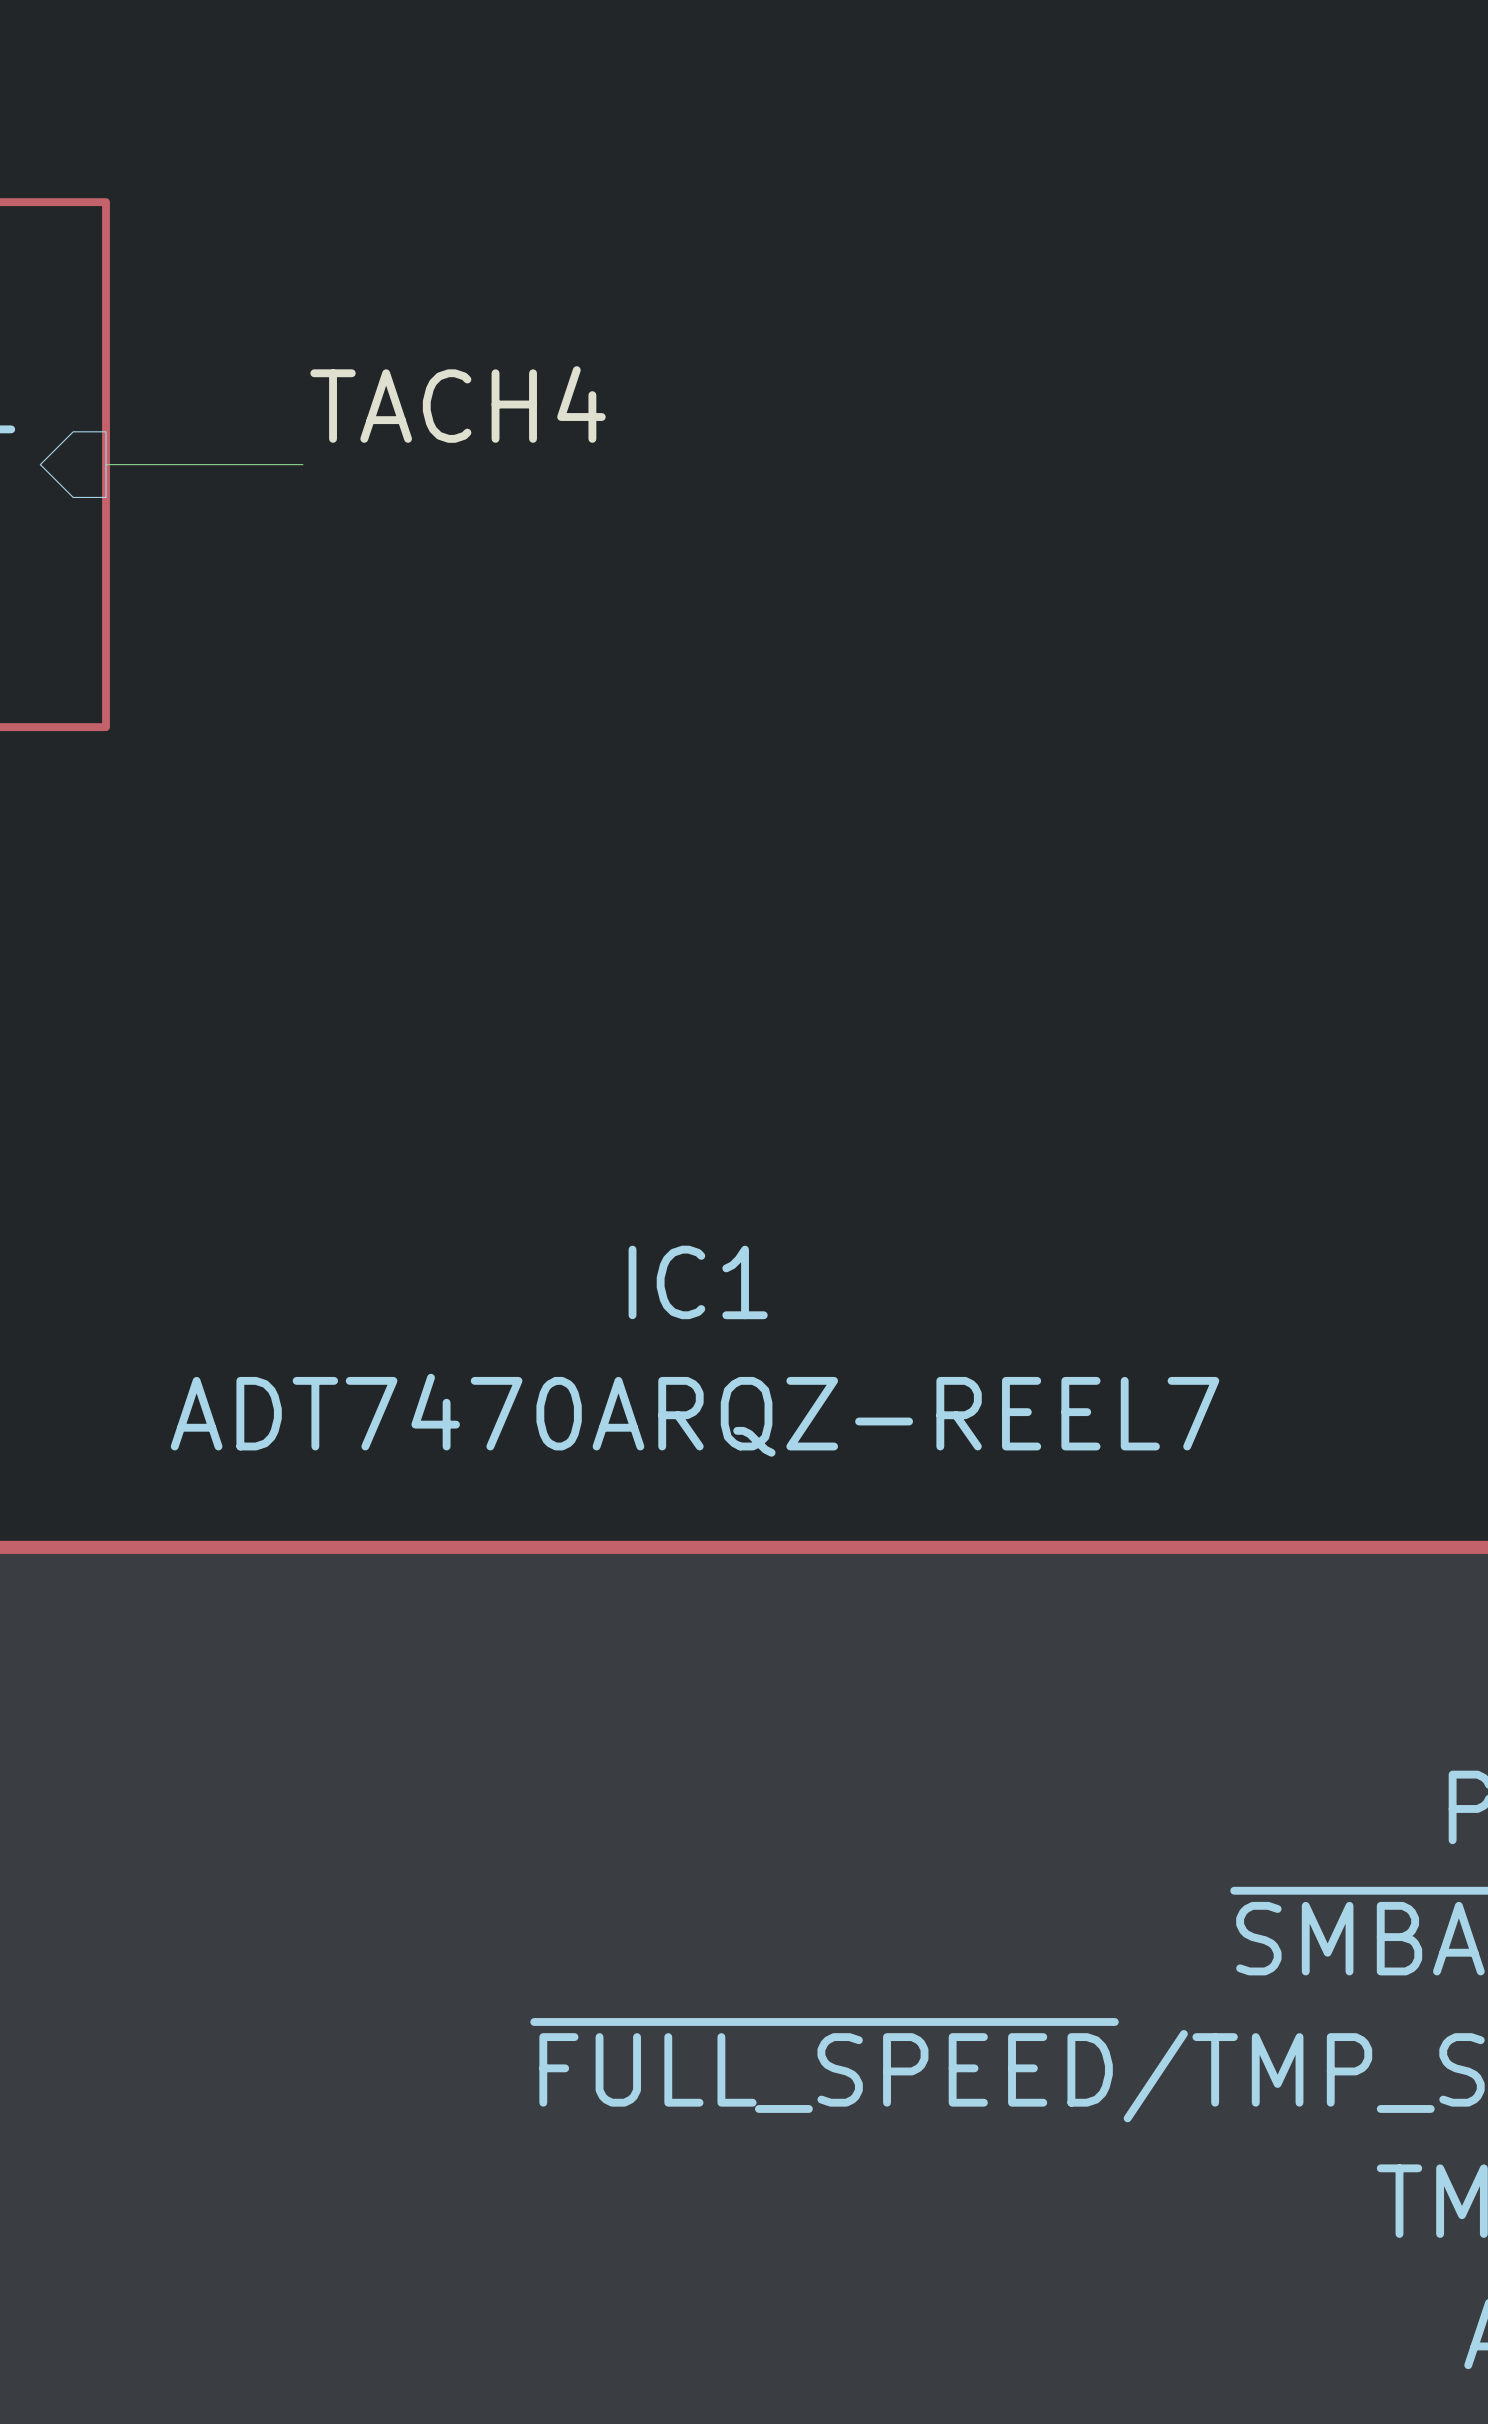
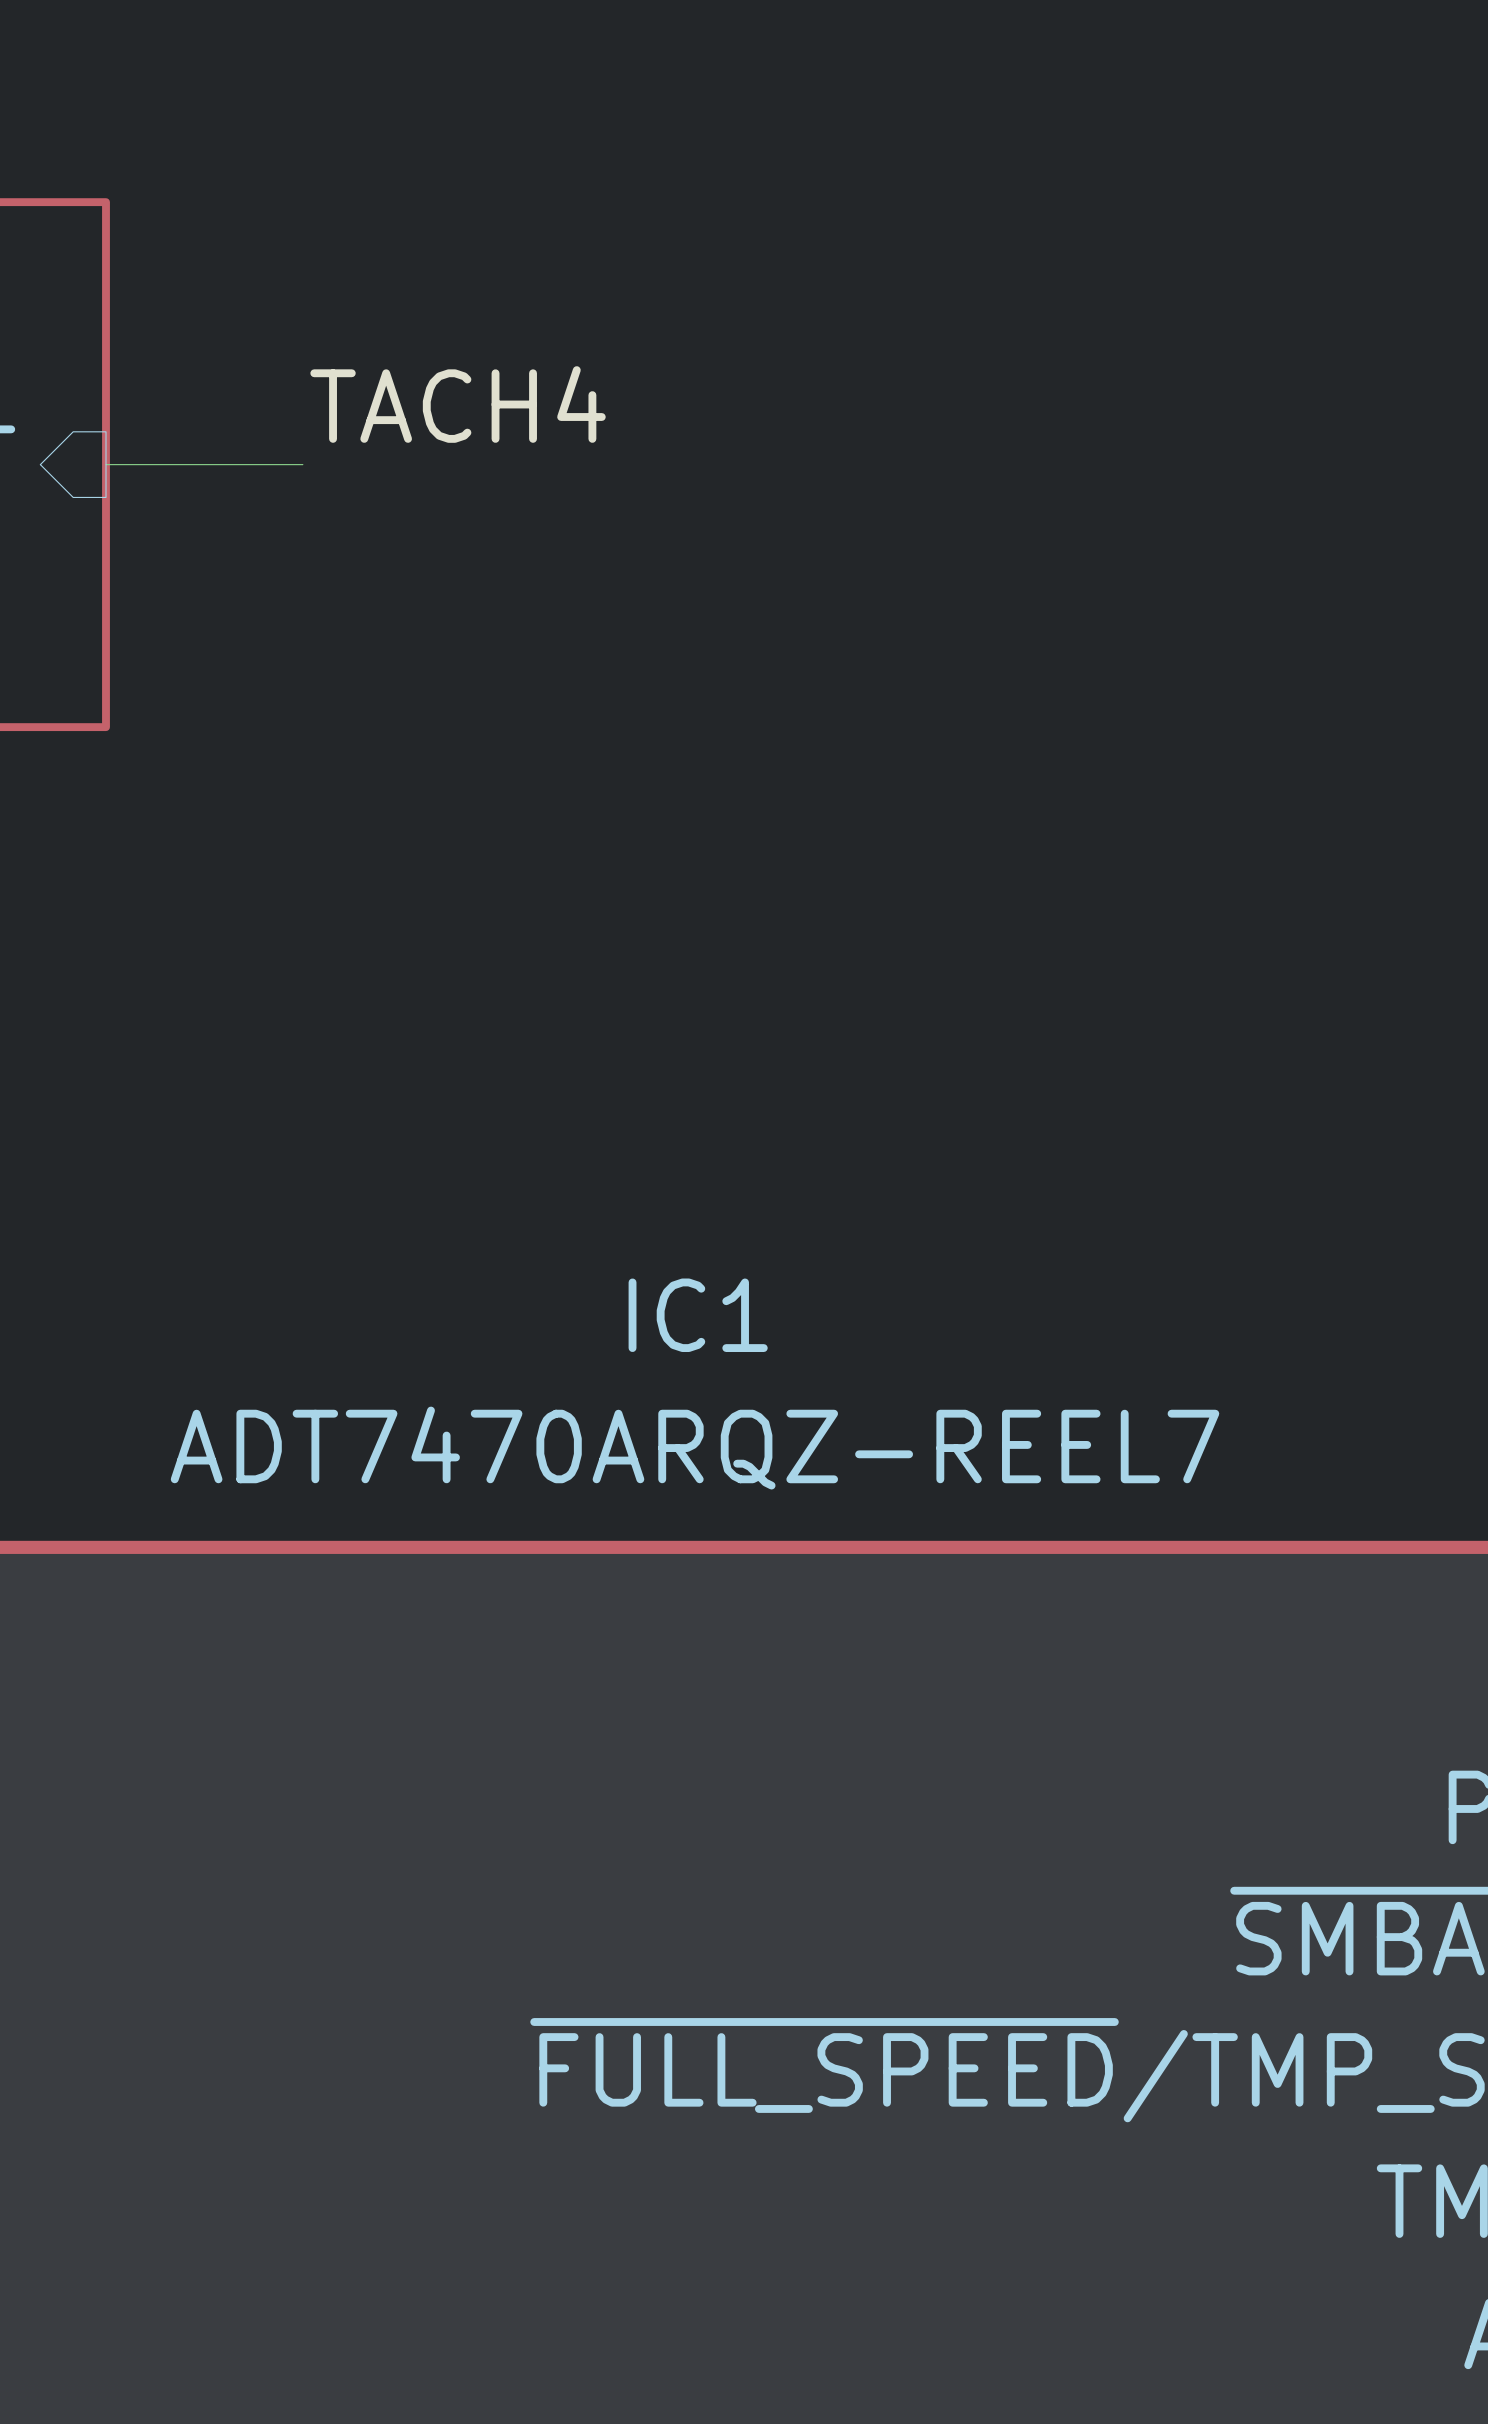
IC1 name position: IC1 (698, 1282) -> IC1 (698, 1315)
IC1 value position: ADT7470ARQZ-REEL7 (695, 1415) -> ADT7470ARQZ-REEL7 (695, 1448)

